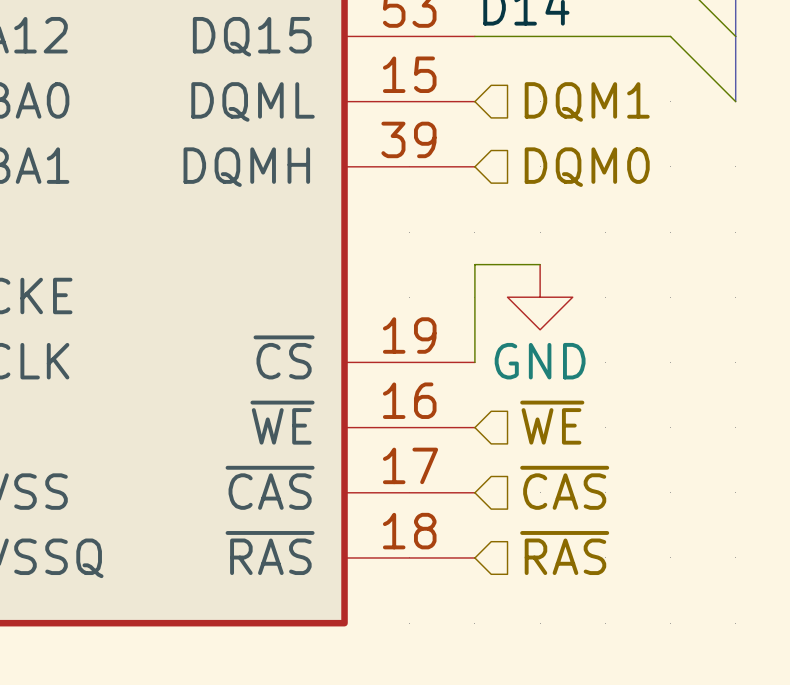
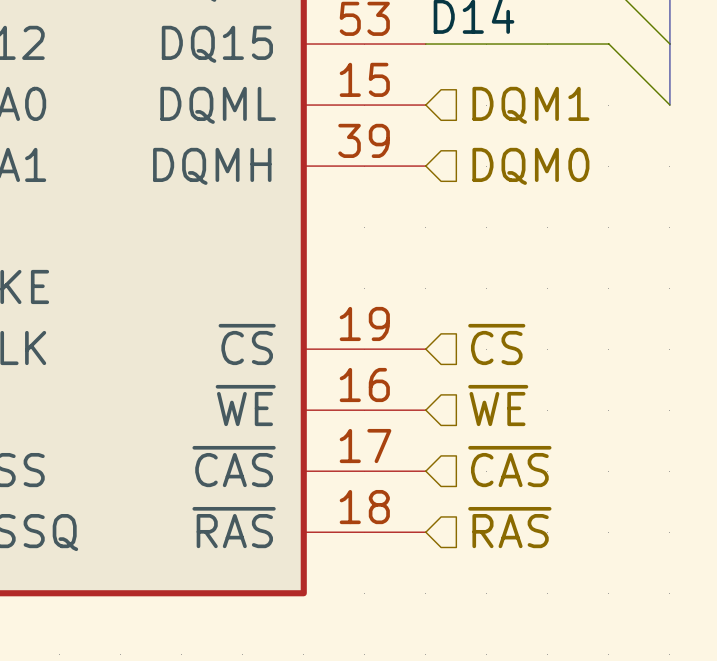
wire: (540, 264) (474, 264) (474, 362) -> none
power symbol: GND (540, 297) -> none
hierarchical label: none -> ~{CS} (496, 344)

